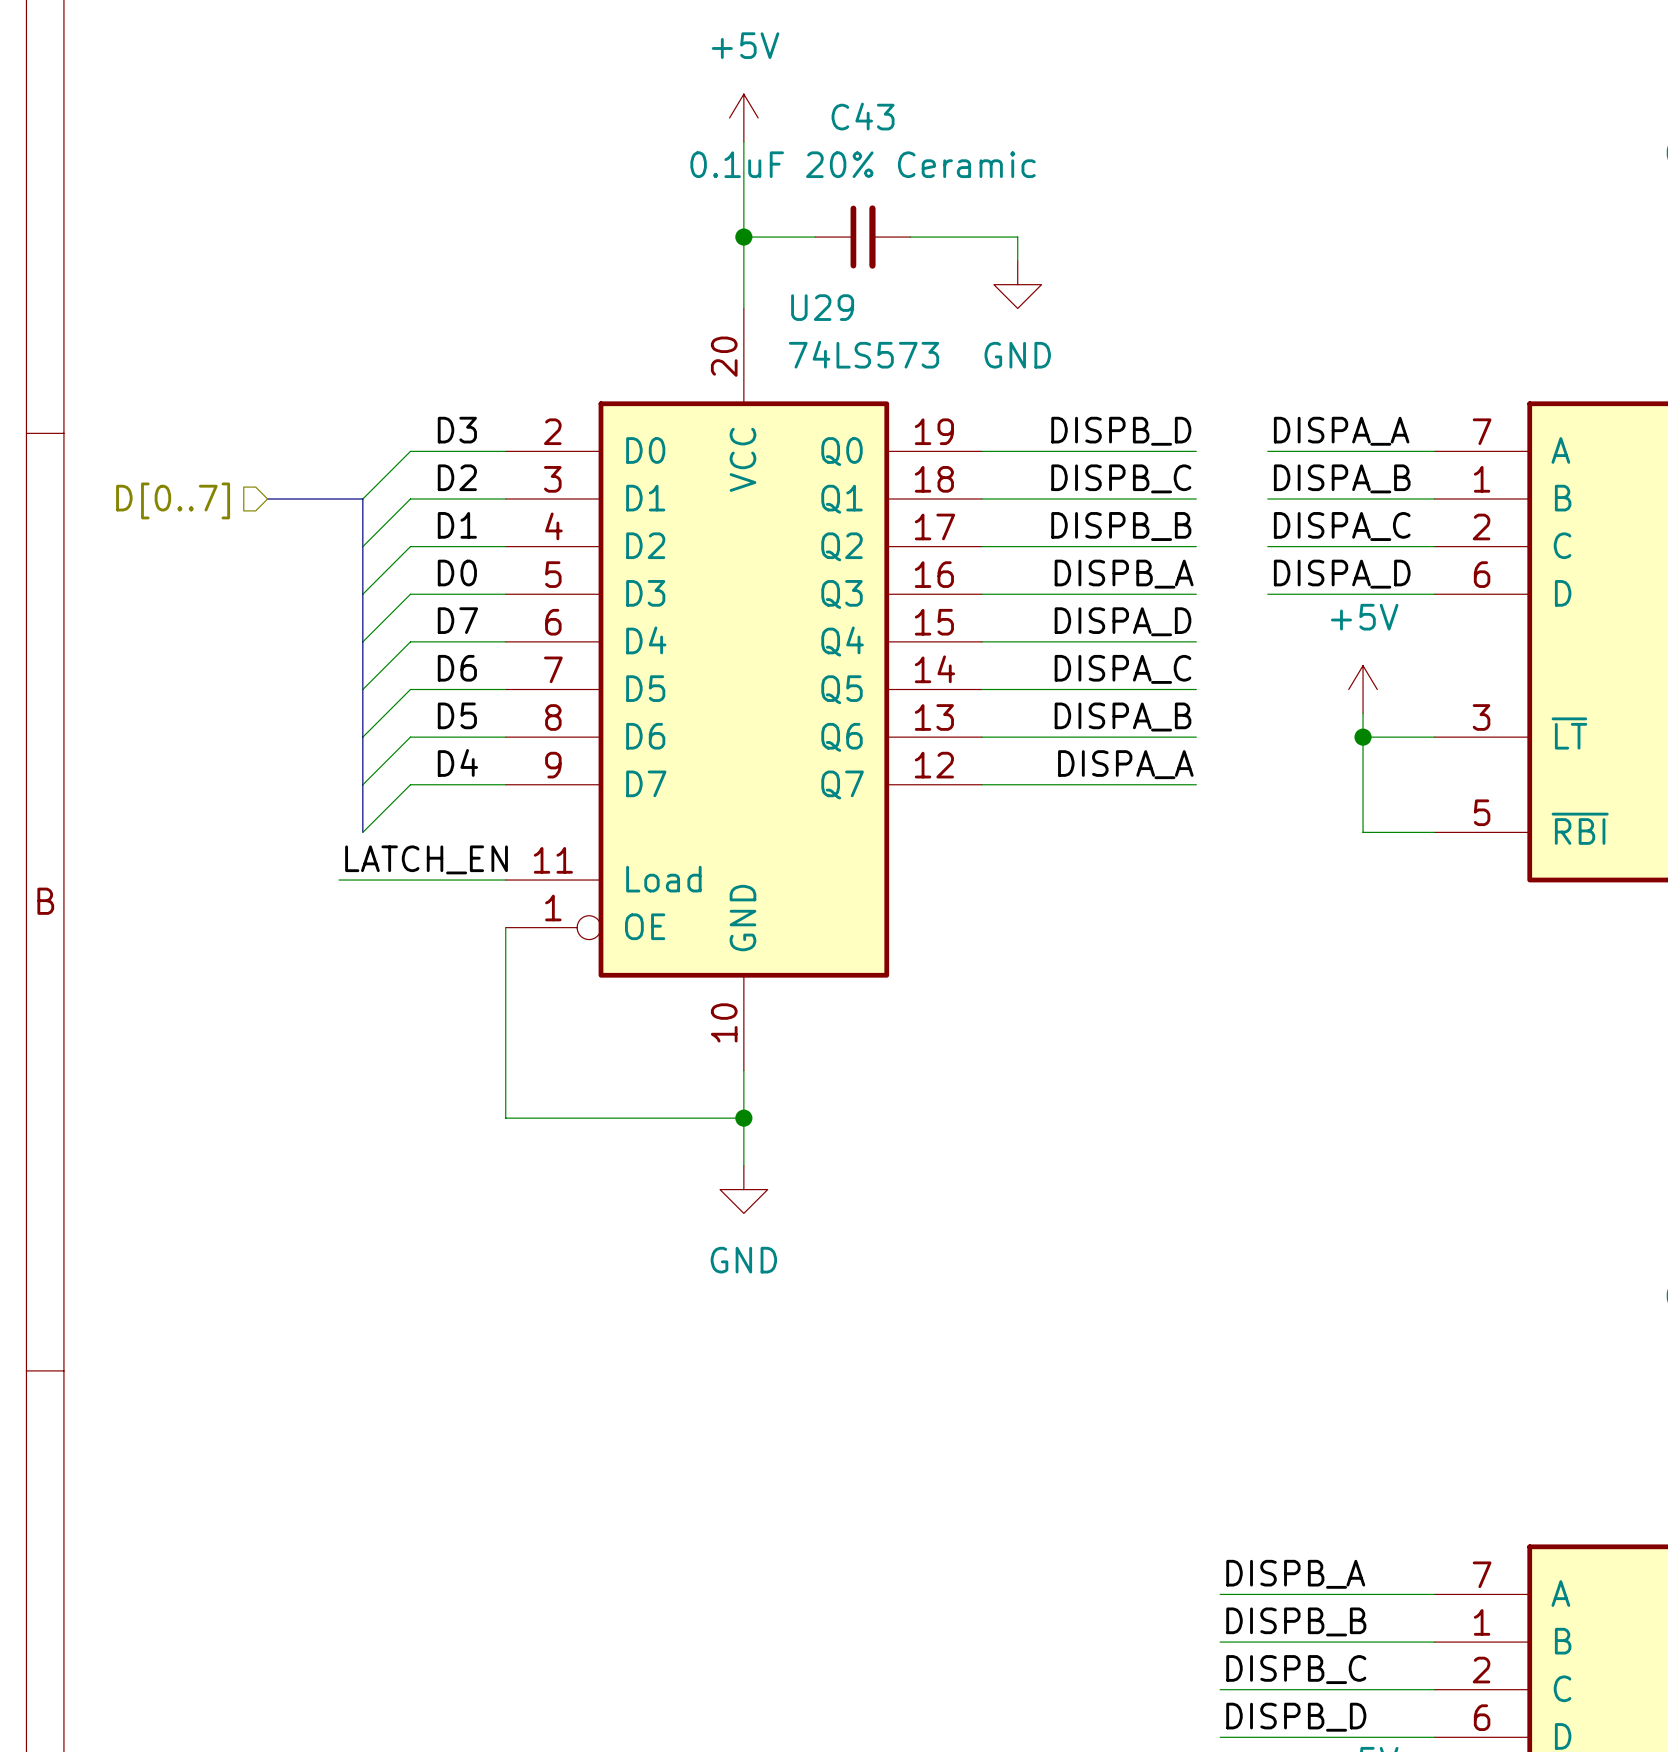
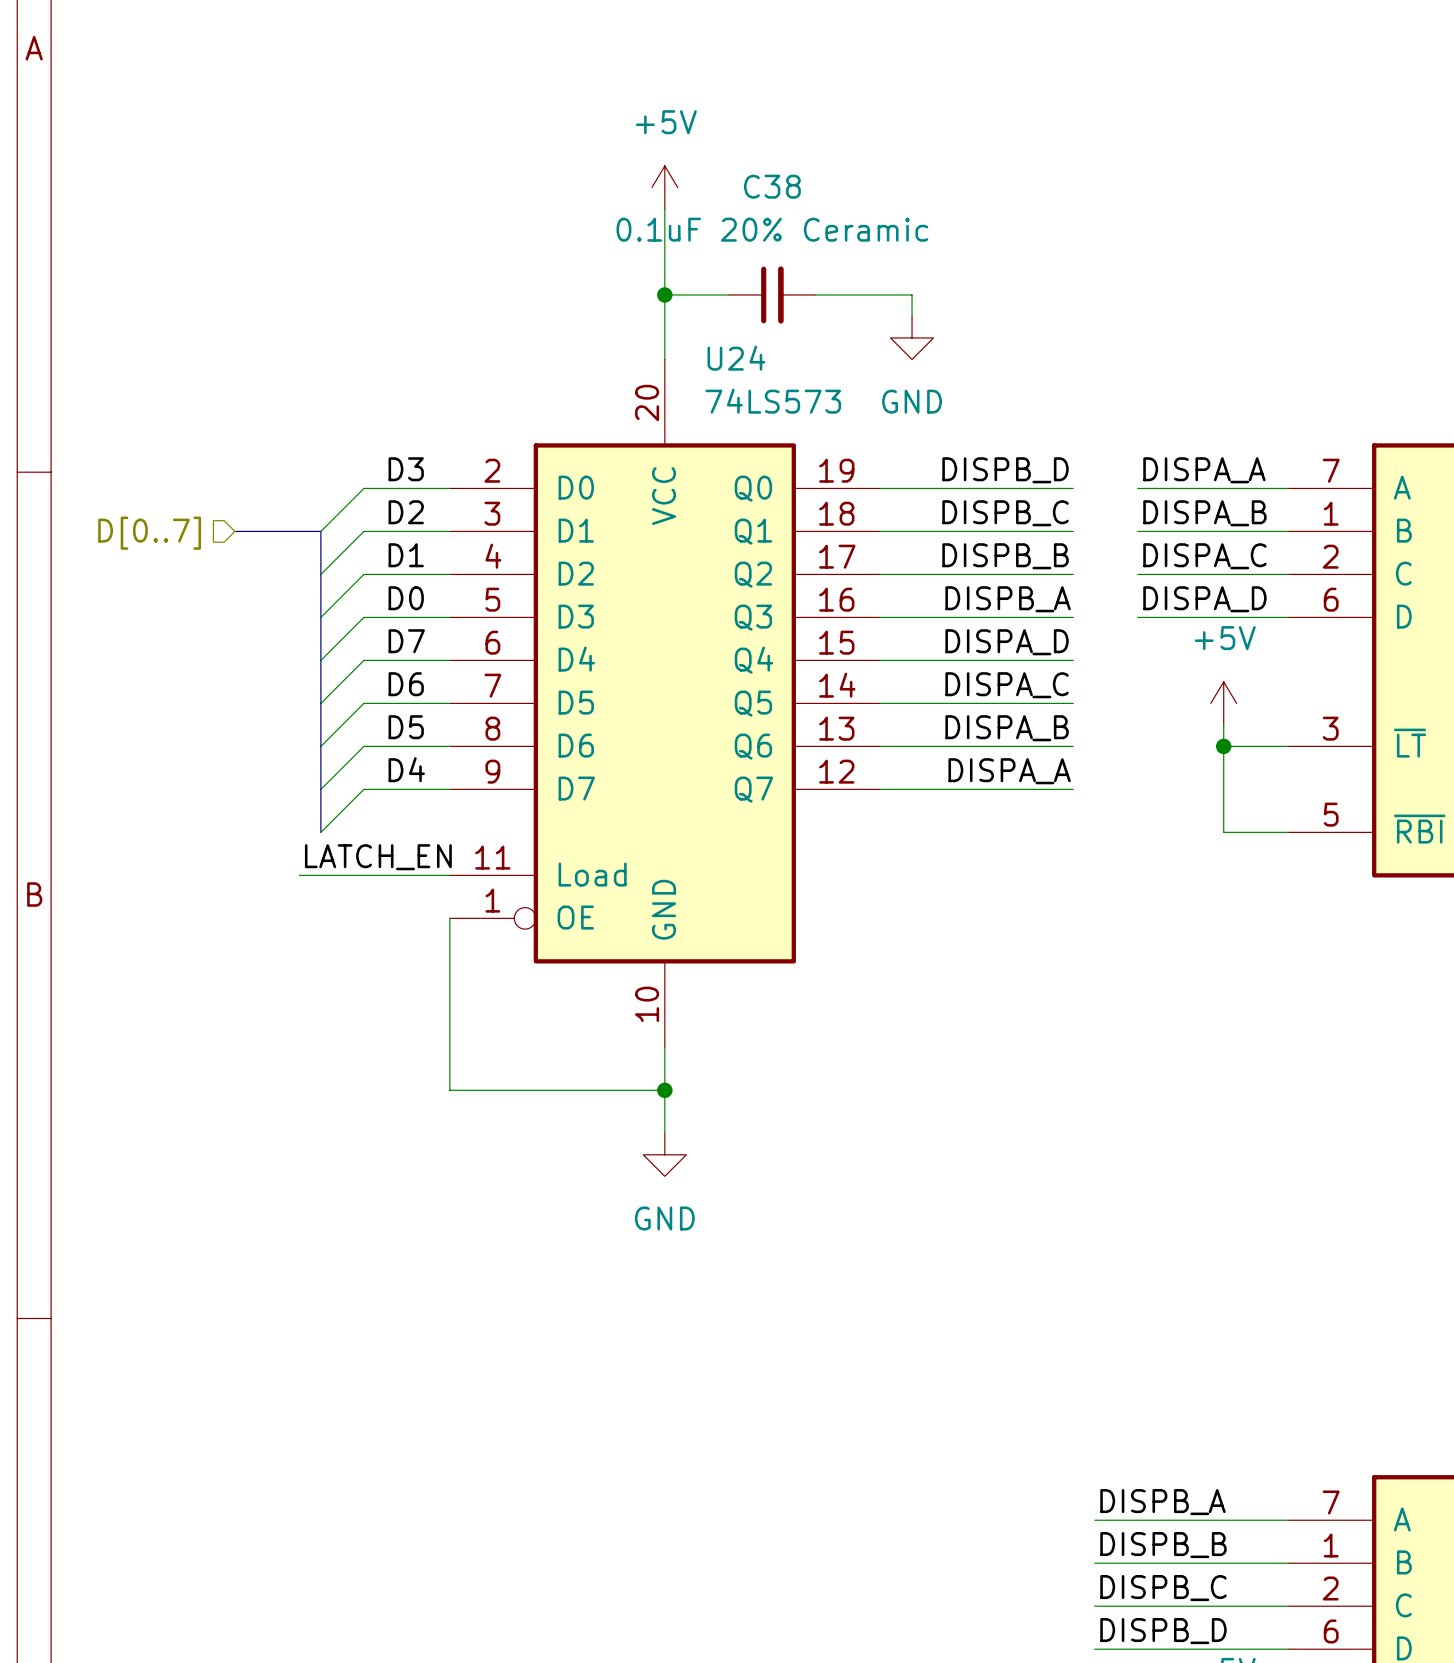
C43 name: C43 (863, 116) -> C38 (772, 186)
U29 name: U29 (822, 307) -> U24 (736, 358)

